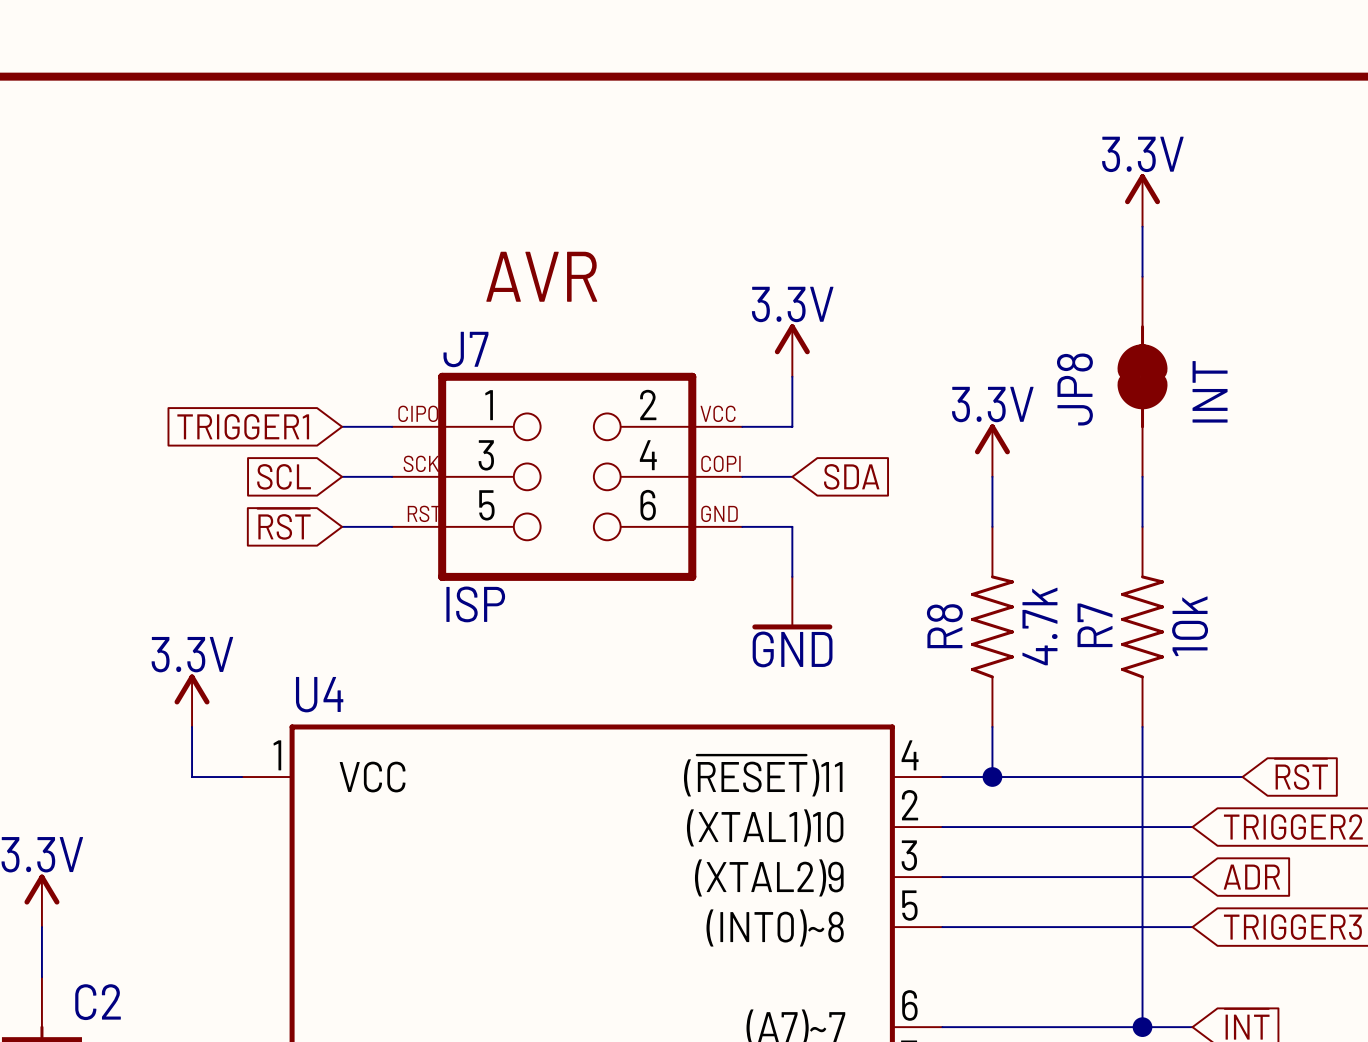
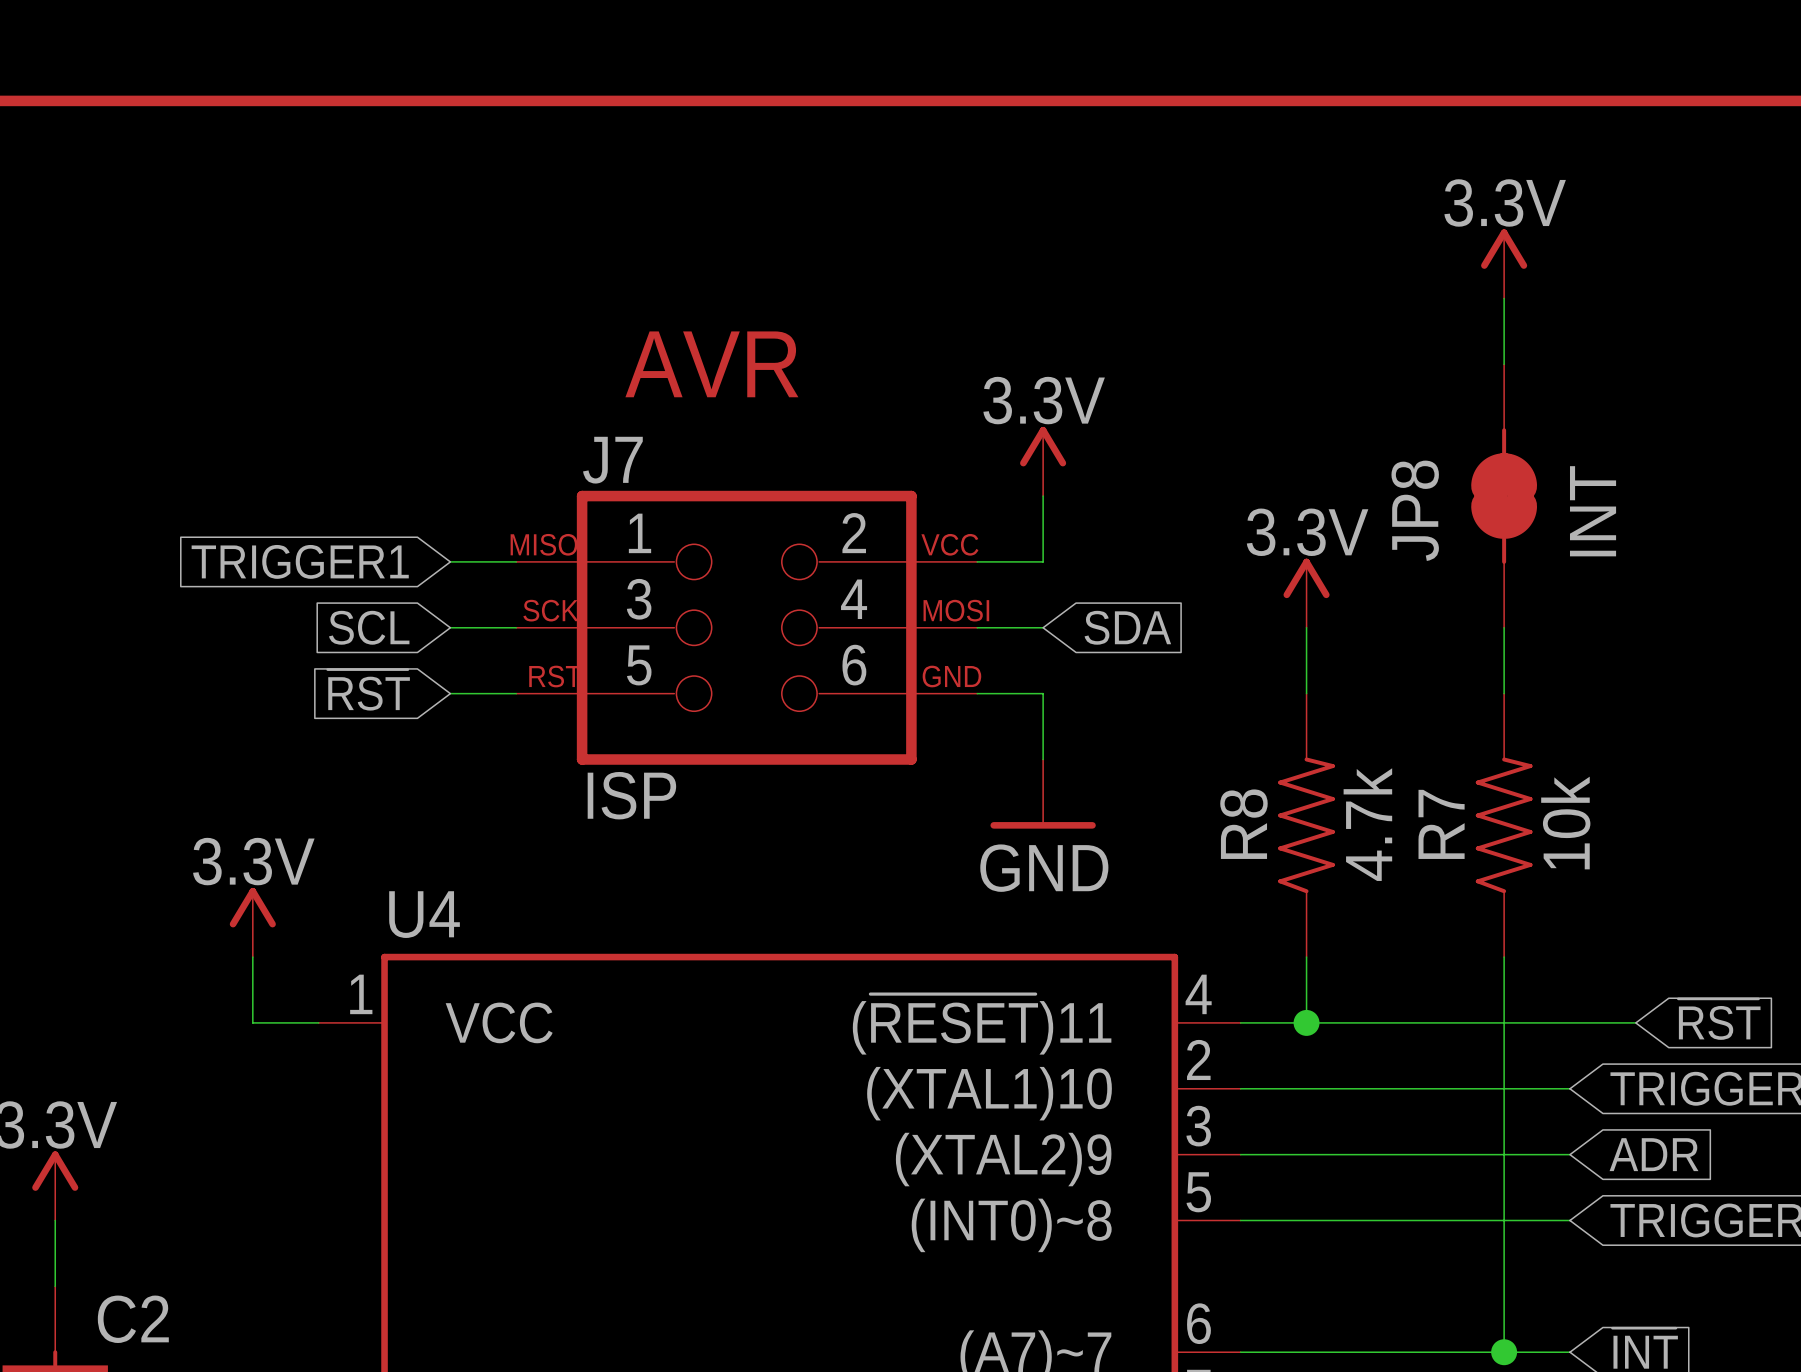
J7 text: CIPO (418, 413) -> MISO (544, 544)
J7 text: COPI (720, 463) -> MOSI (956, 610)
power symbol text position: GND (792, 649) -> GND (1044, 868)

